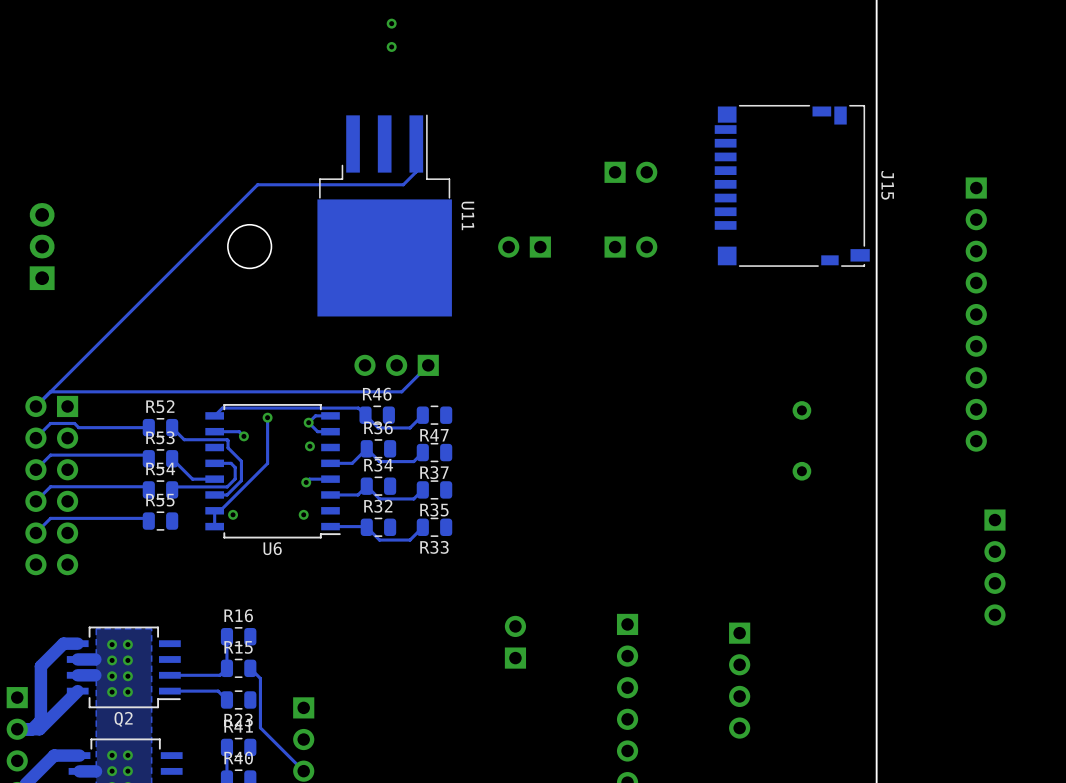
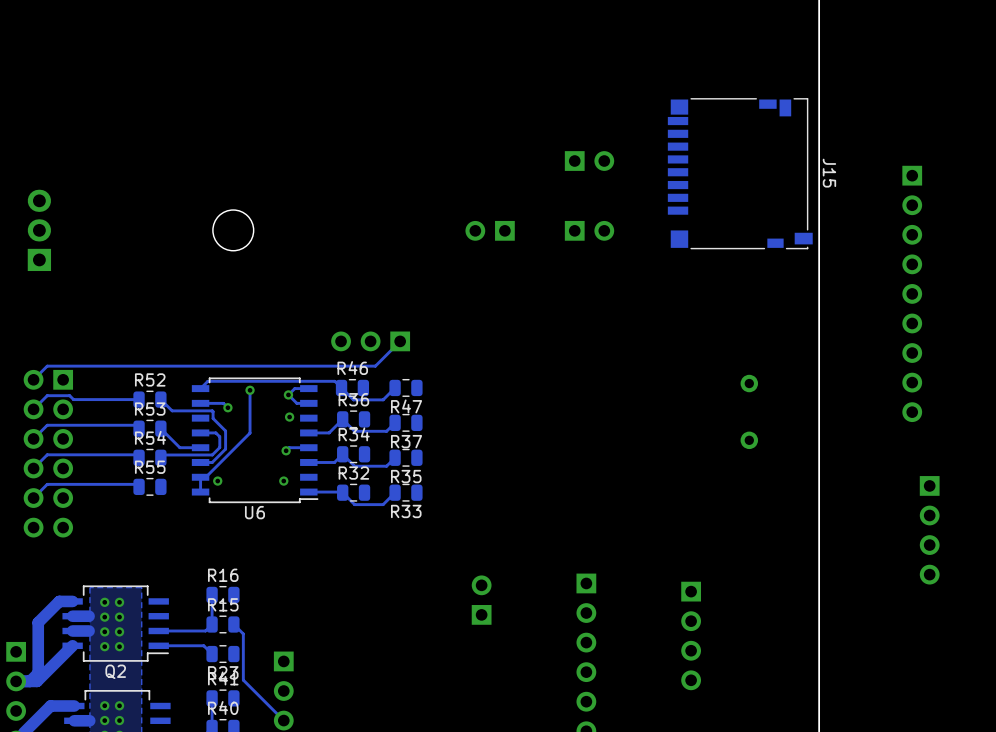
via: (391, 23) -> none
via: (391, 46) -> none
track: (416, 143) (416, 171) (403, 184) (257, 184) (50, 391) -> none
U11: (384, 215) -> none

